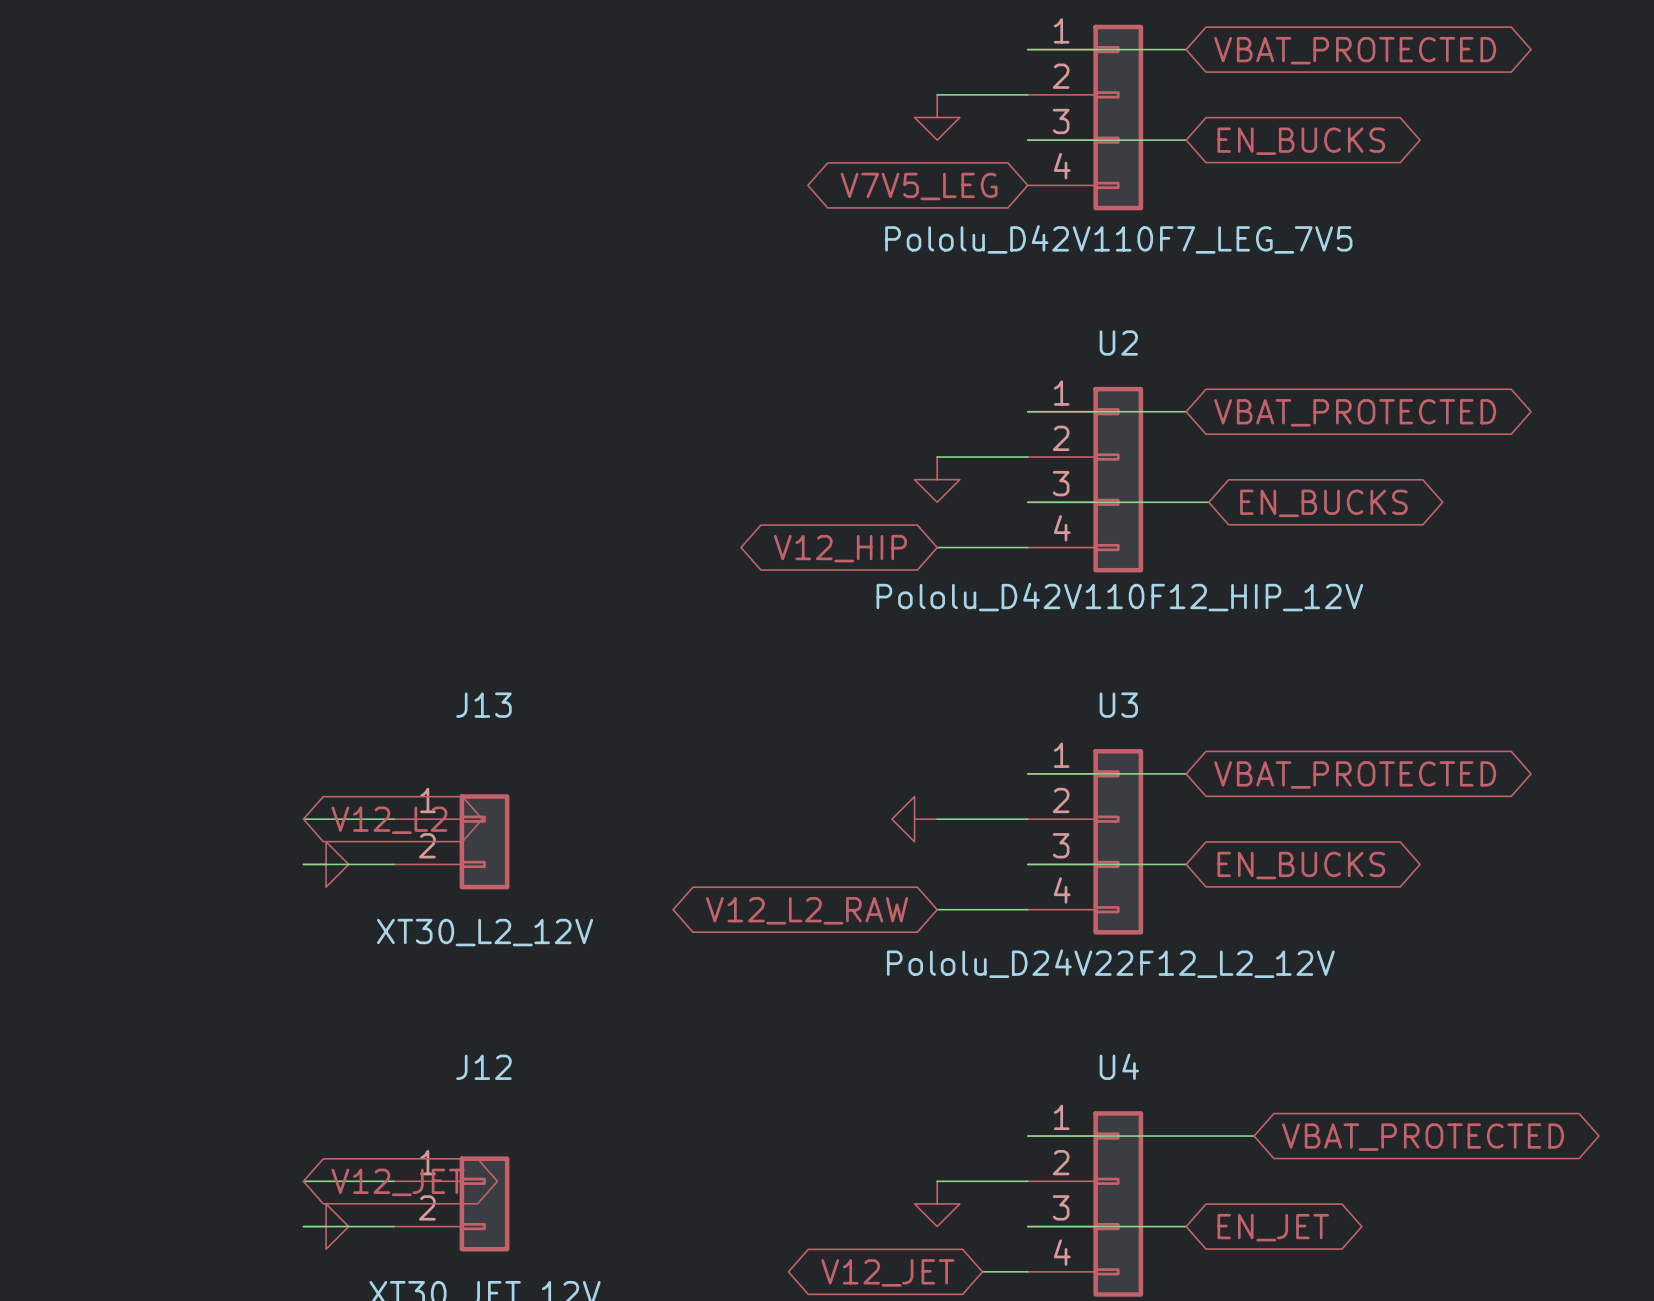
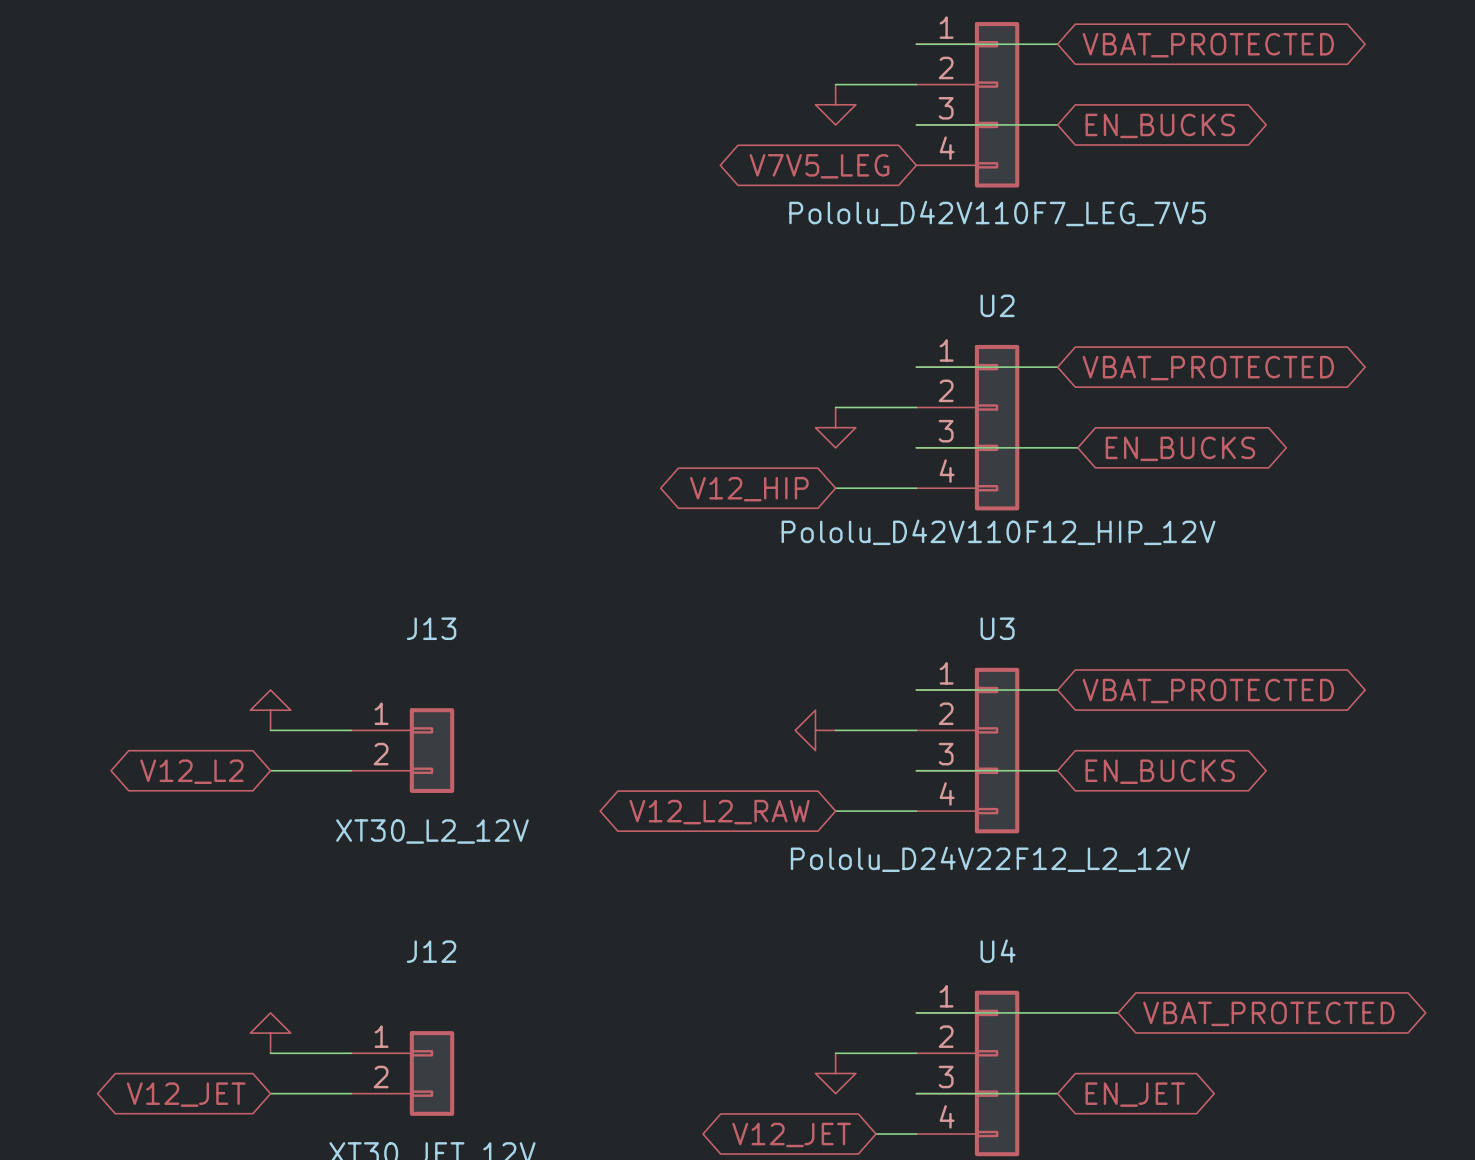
global label rotation: 0° (389, 820) -> 180° (191, 771)
global label position: V12_L2 (389, 820) -> V12_L2 (191, 771)
power symbol rotation: 0° (326, 864) -> 90° counterclockwise (270, 710)
power symbol position: (326, 864) -> (270, 710)
global label rotation: 0° (398, 1182) -> 180° (186, 1094)
global label position: V12_JET (398, 1182) -> V12_JET (186, 1094)
power symbol rotation: 0° (326, 1226) -> 90° counterclockwise (270, 1033)
power symbol position: (326, 1226) -> (270, 1033)

